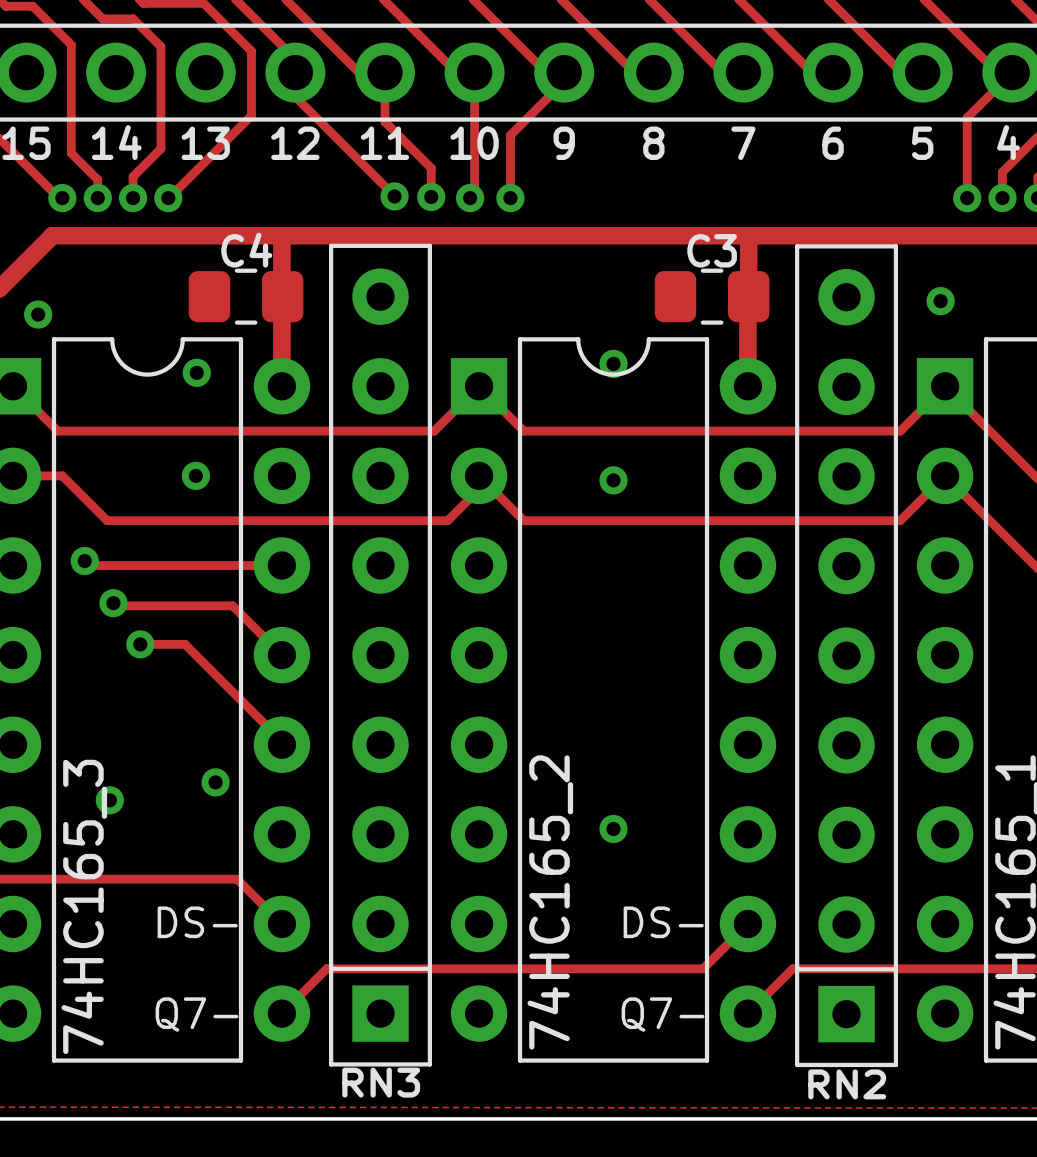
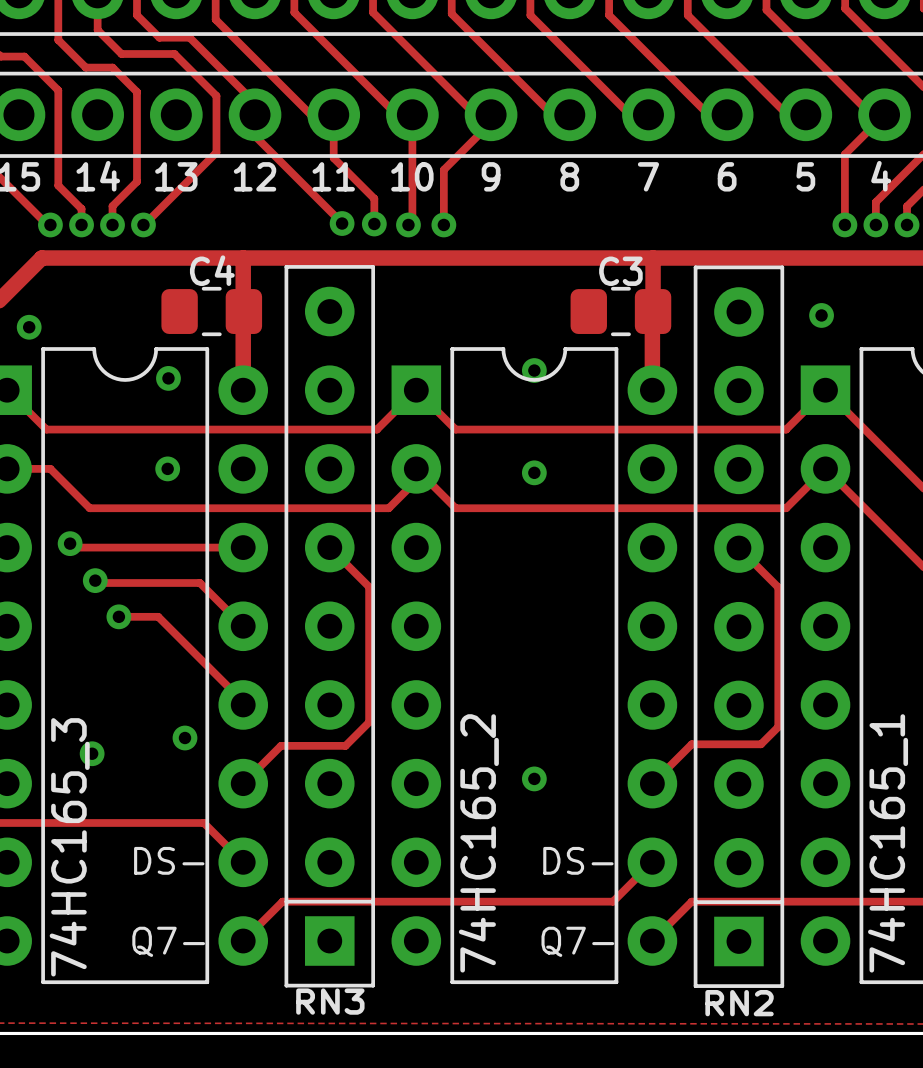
track: none -> (329, 547) (369, 586) (369, 722) (345, 745) (280, 745) (243, 783)
track: none -> (738, 548) (778, 587) (778, 726) (760, 744) (691, 744) (652, 783)

